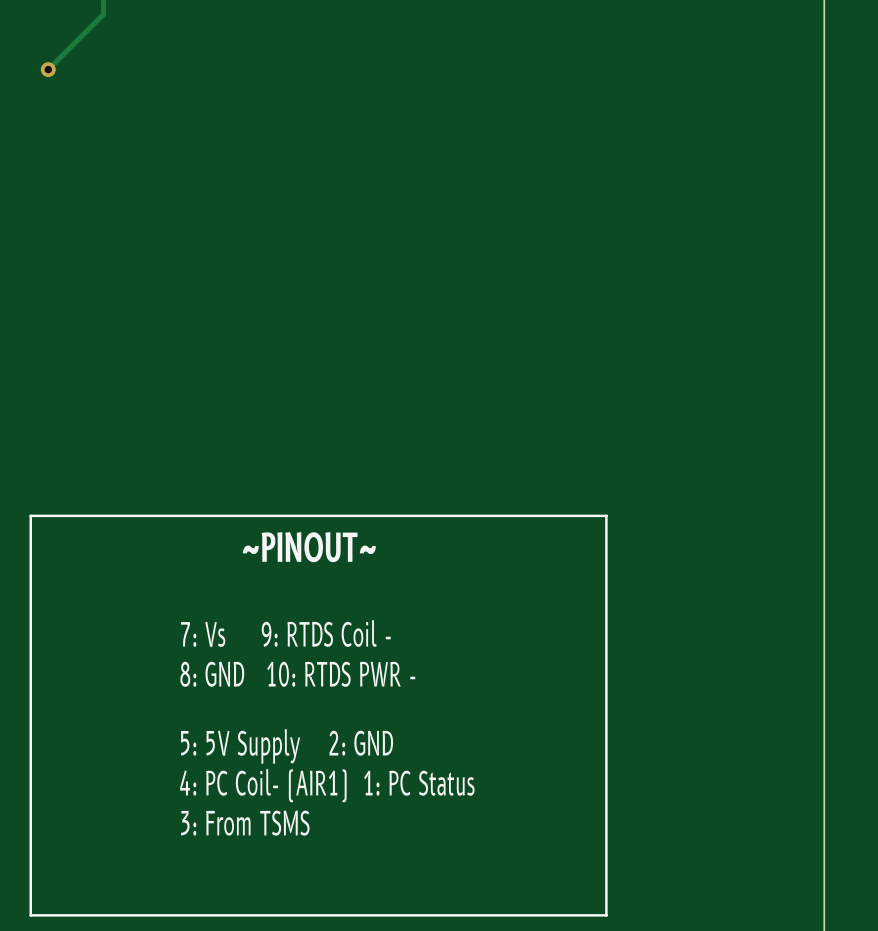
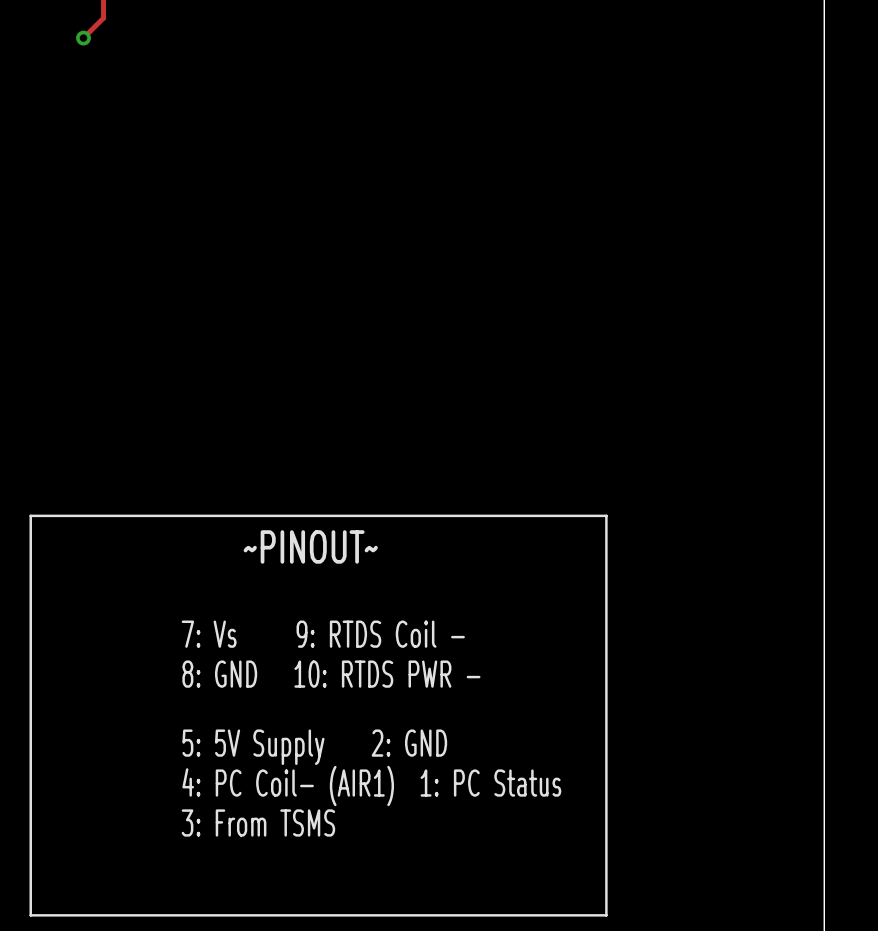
track: (103, 14) (48, 69) -> (103, 14) (103, 18) (83, 38)
via position: (48, 69) -> (83, 38)

